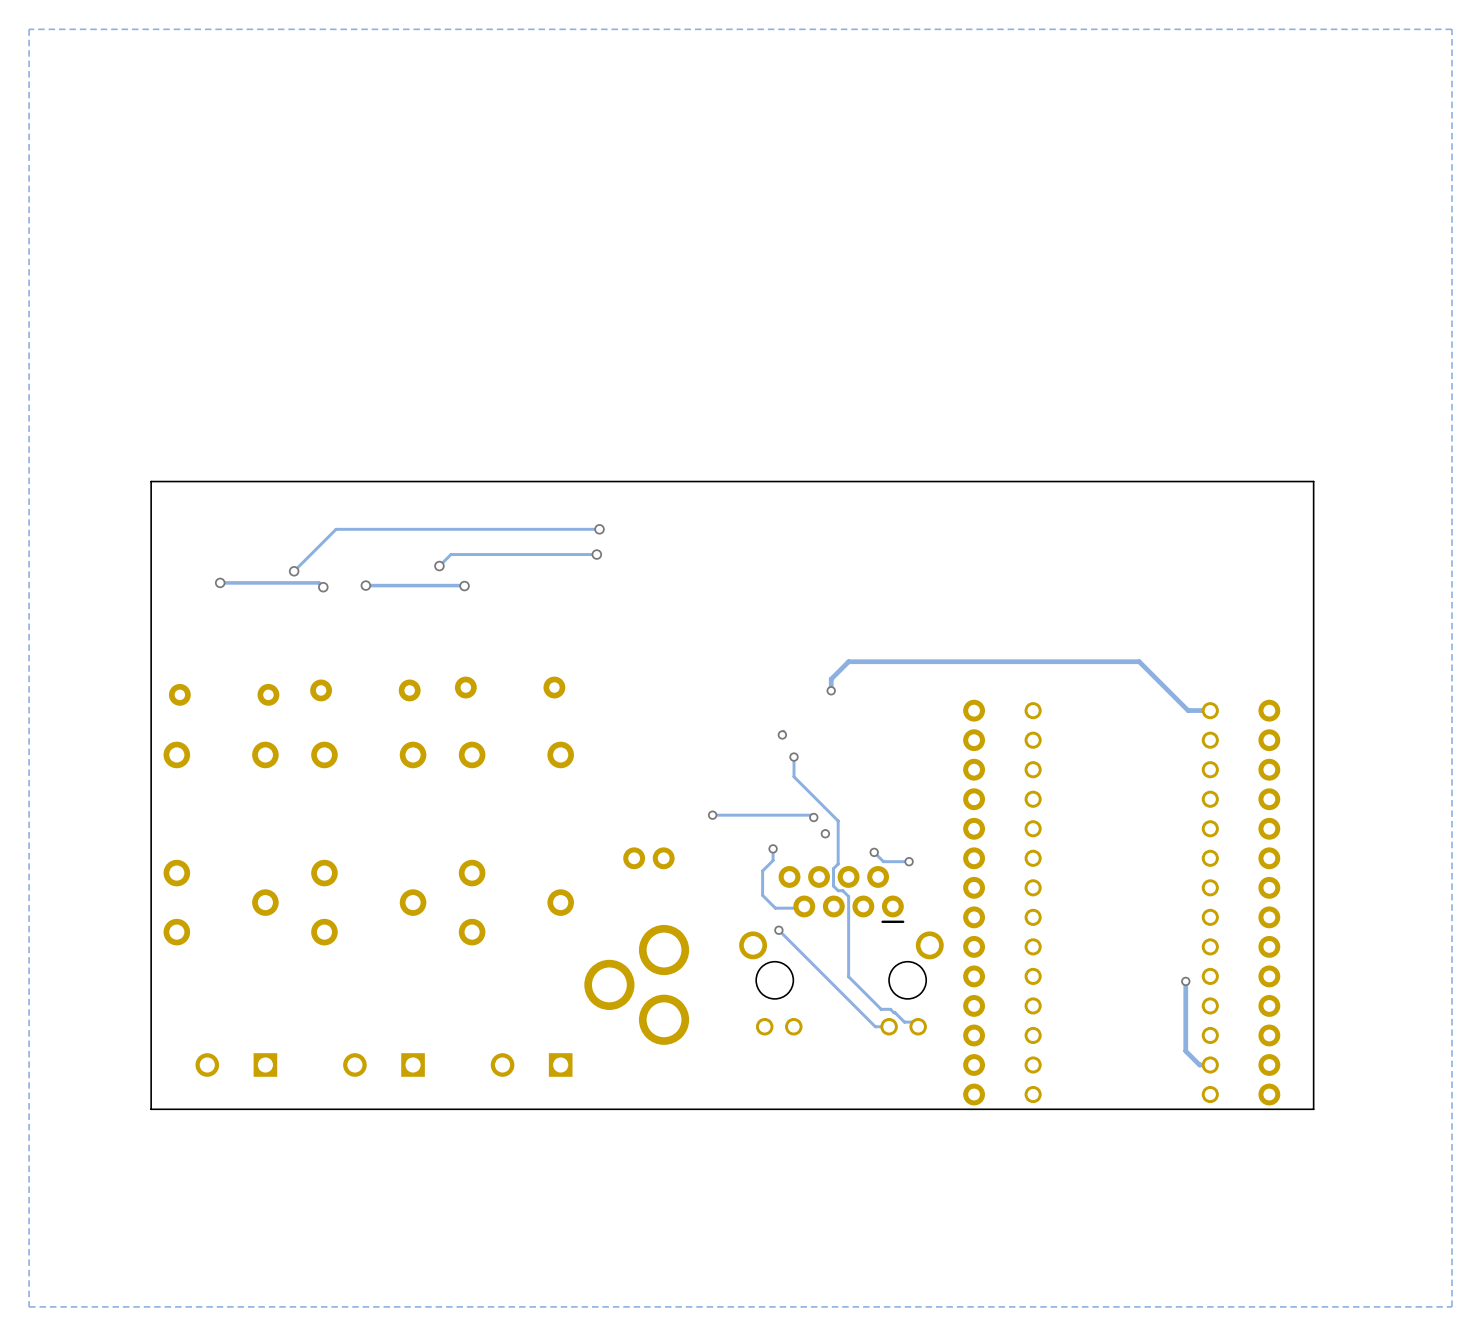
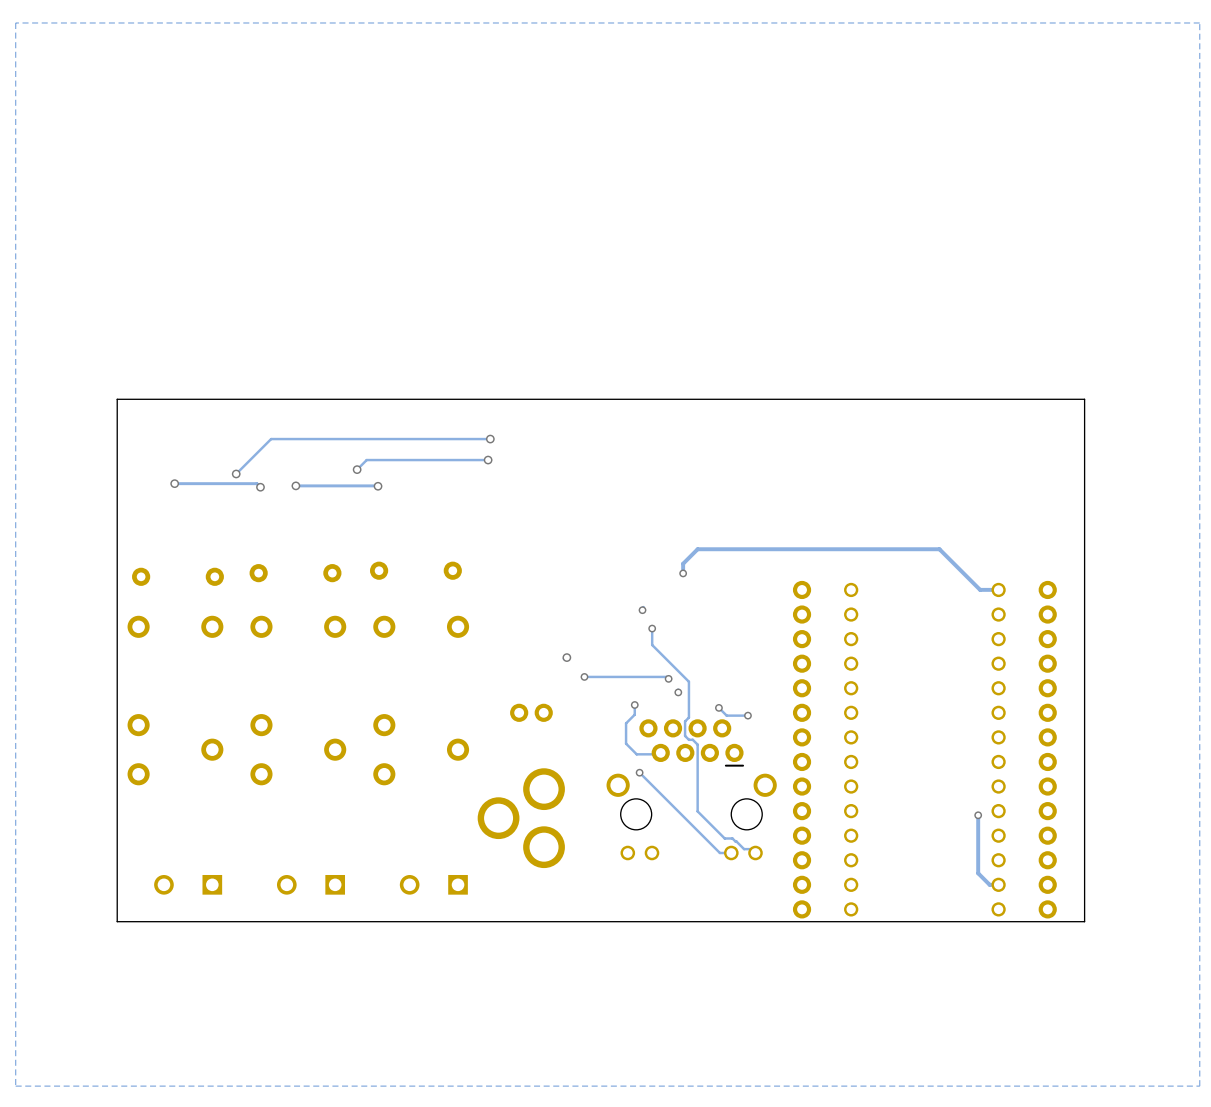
via: none -> (566, 657)

